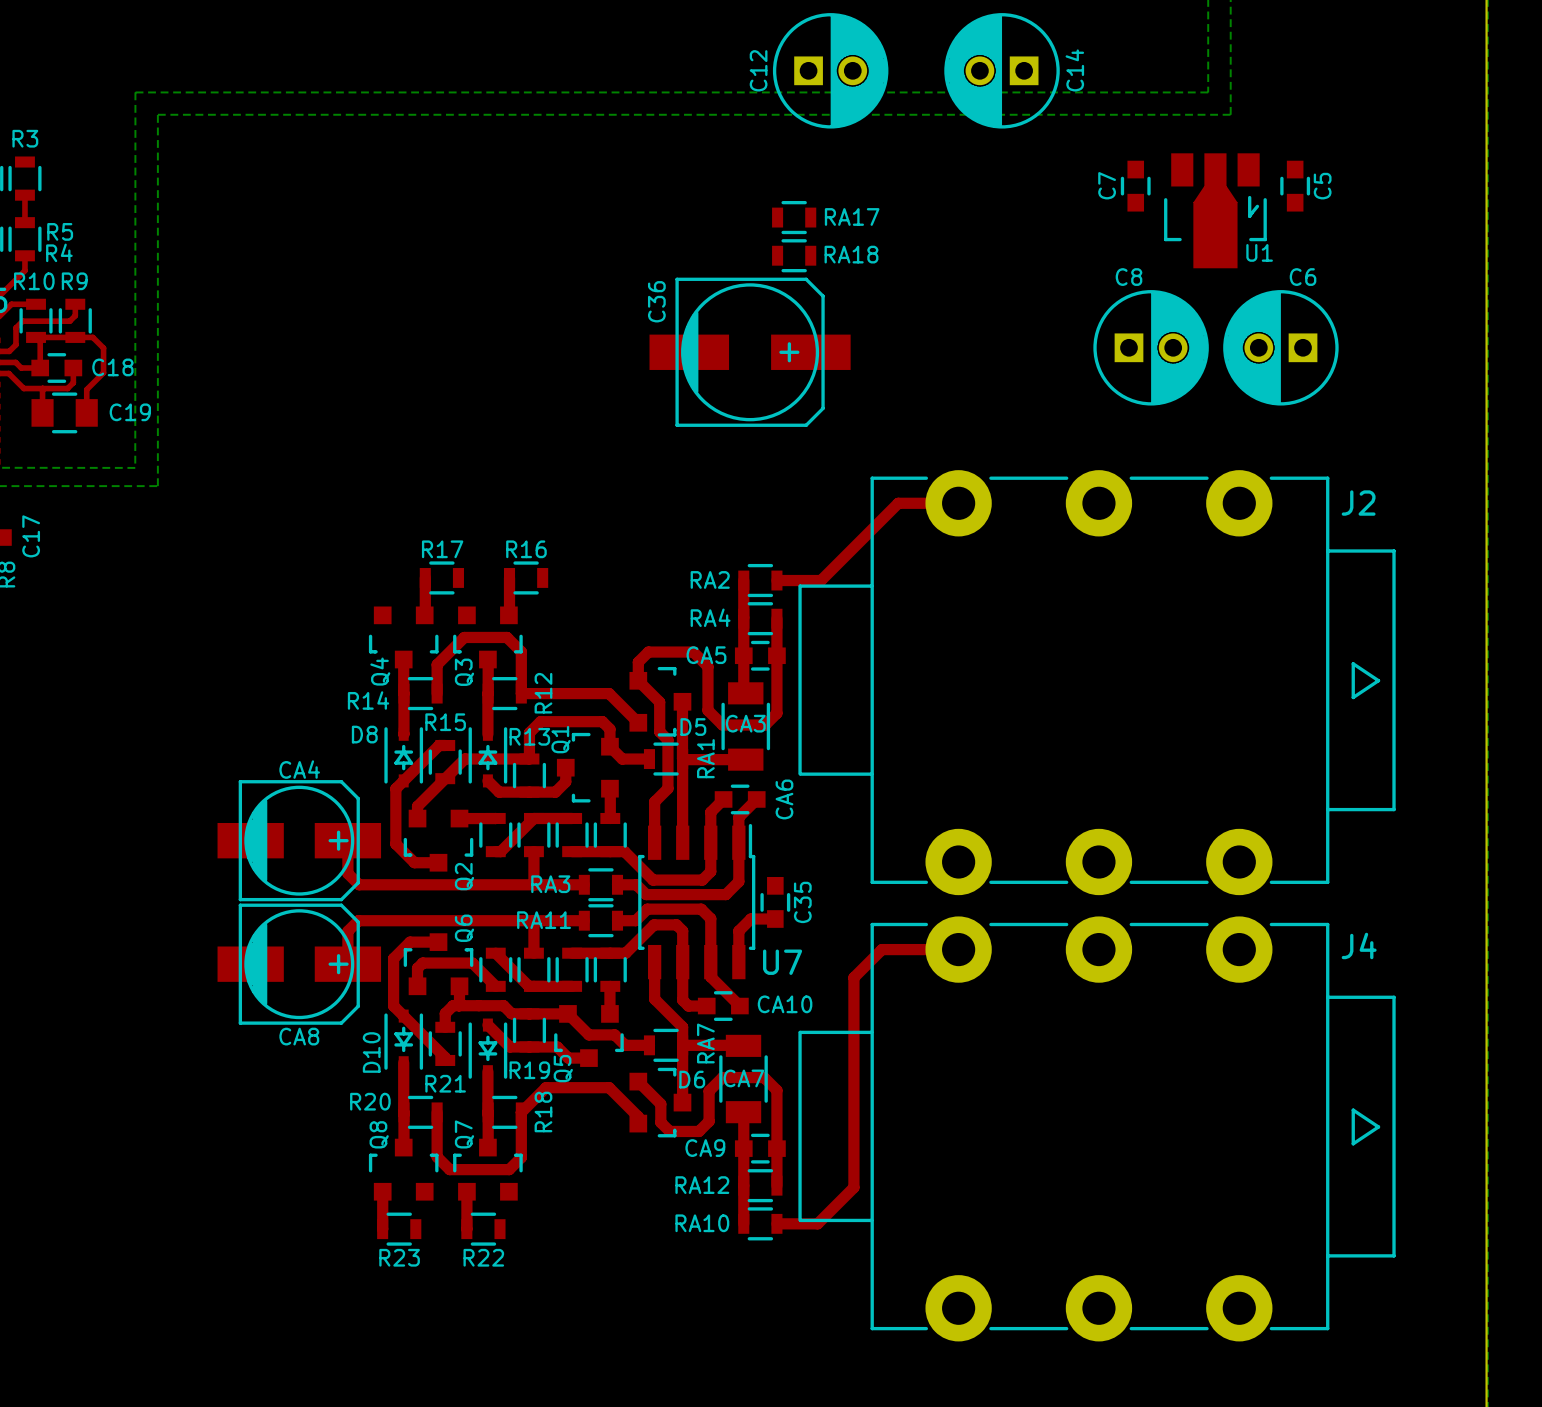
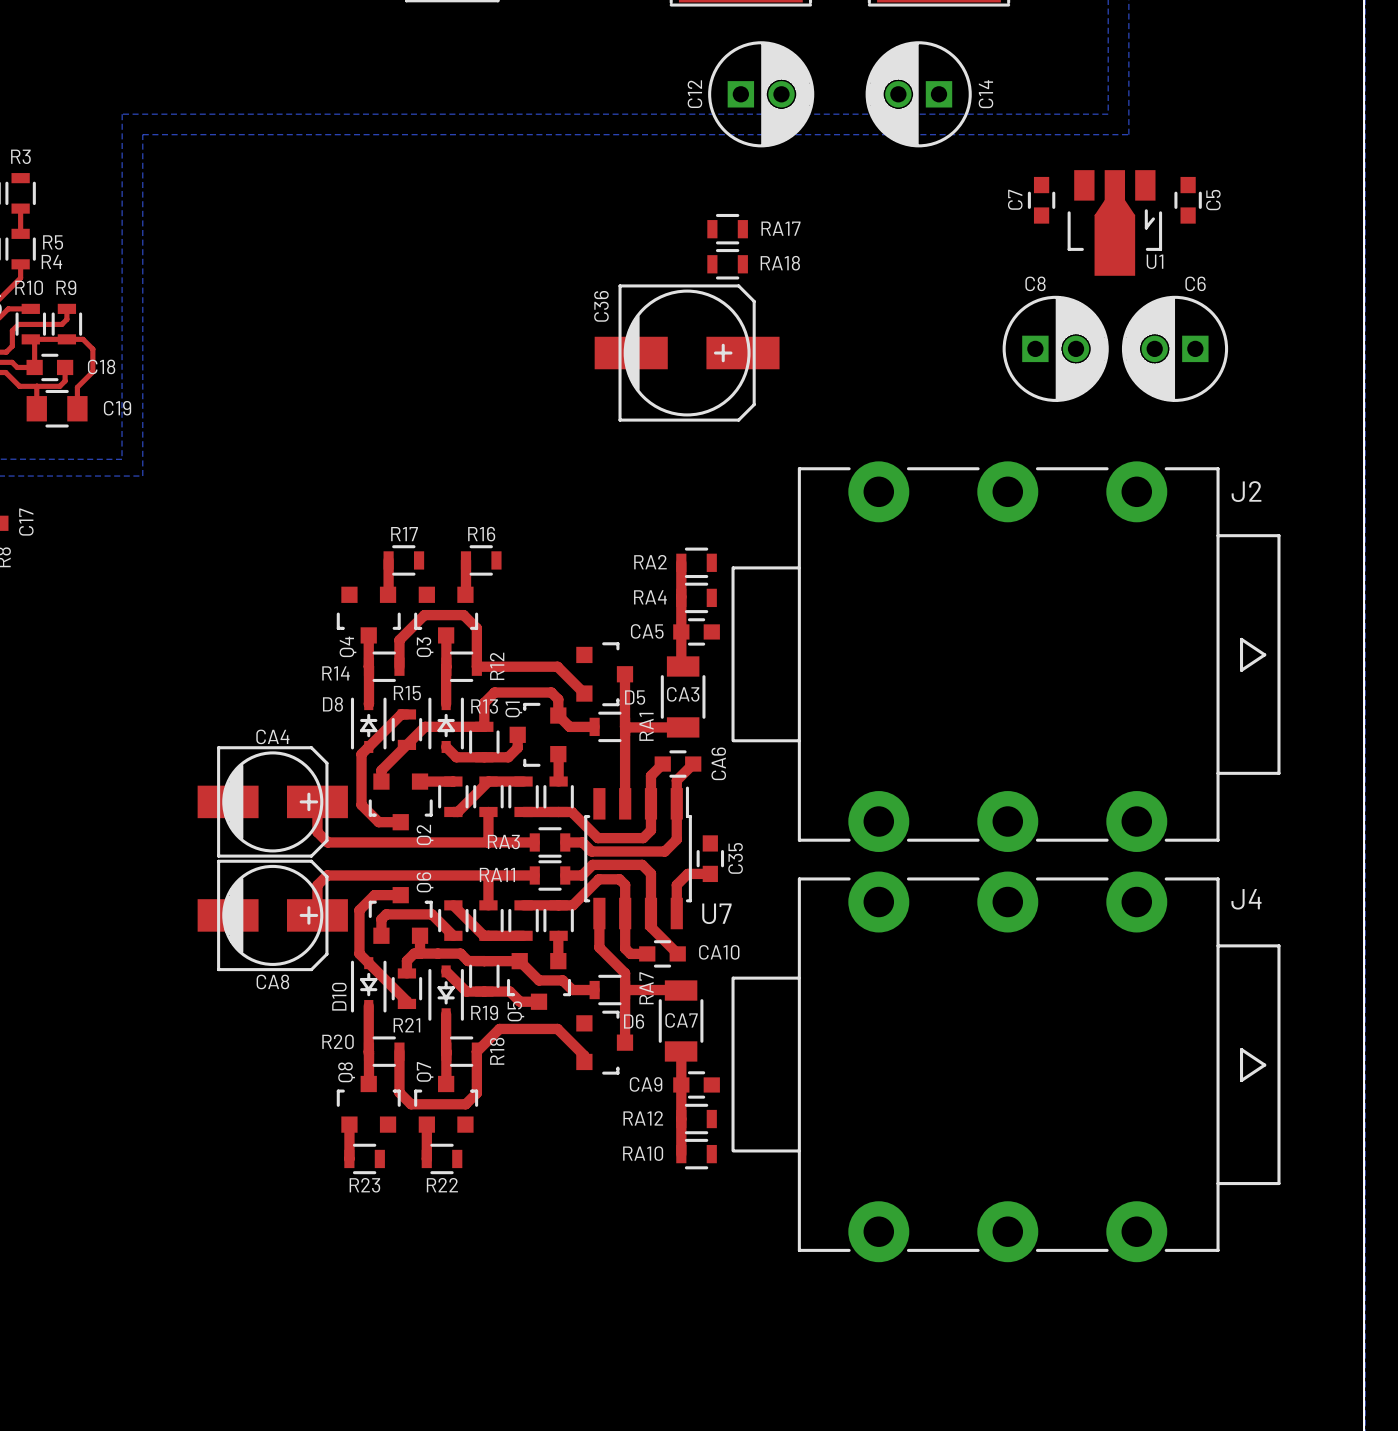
top track: (958, 503) (898, 503) (821, 580) (776, 580) -> none
top track: (776, 618) (776, 713) (765, 725) (722, 725) (707, 710) (707, 666) (693, 652) (648, 652) (638, 662) (638, 680) (659, 702) (659, 731) (667, 740) (667, 788) (654, 801) (654, 842) -> none
top track: (958, 949) (881, 949) (853, 977) (853, 1187) (817, 1223) (776, 1223) -> none
top track: (638, 1081) (660, 1104) (660, 1122) (669, 1131) (698, 1131) (709, 1121) (709, 1091) (722, 1077) (764, 1077) (776, 1090) (776, 1185) -> none

